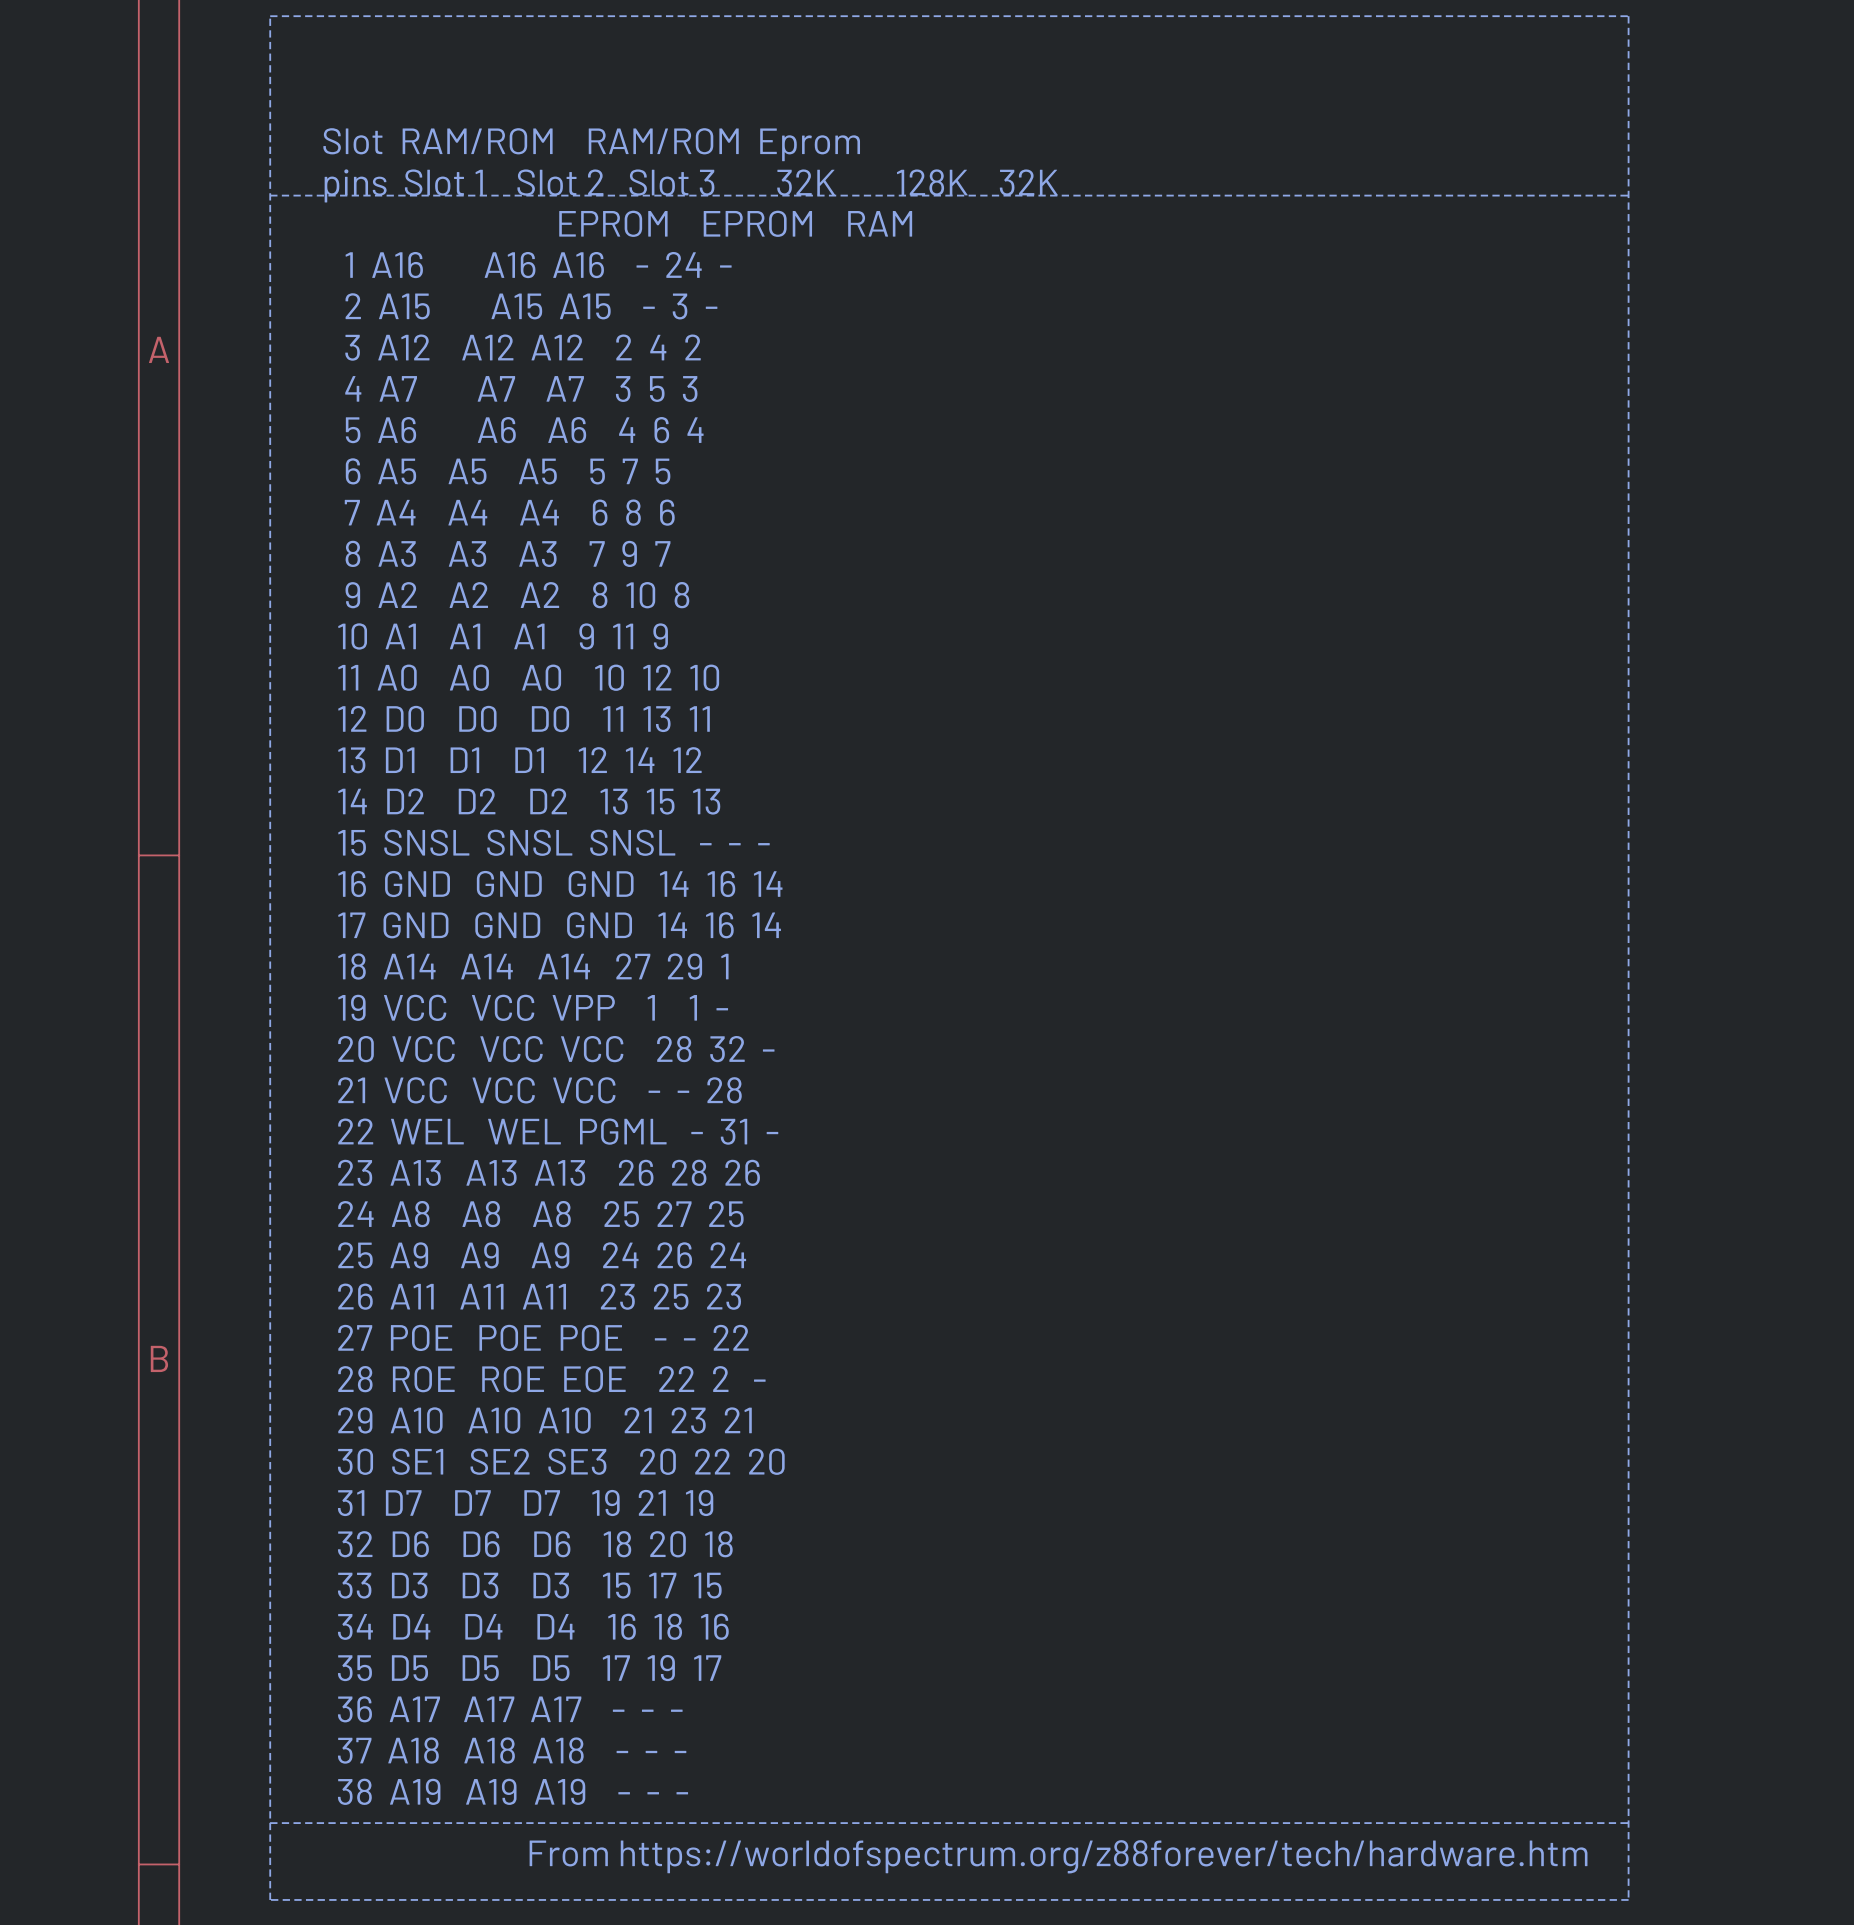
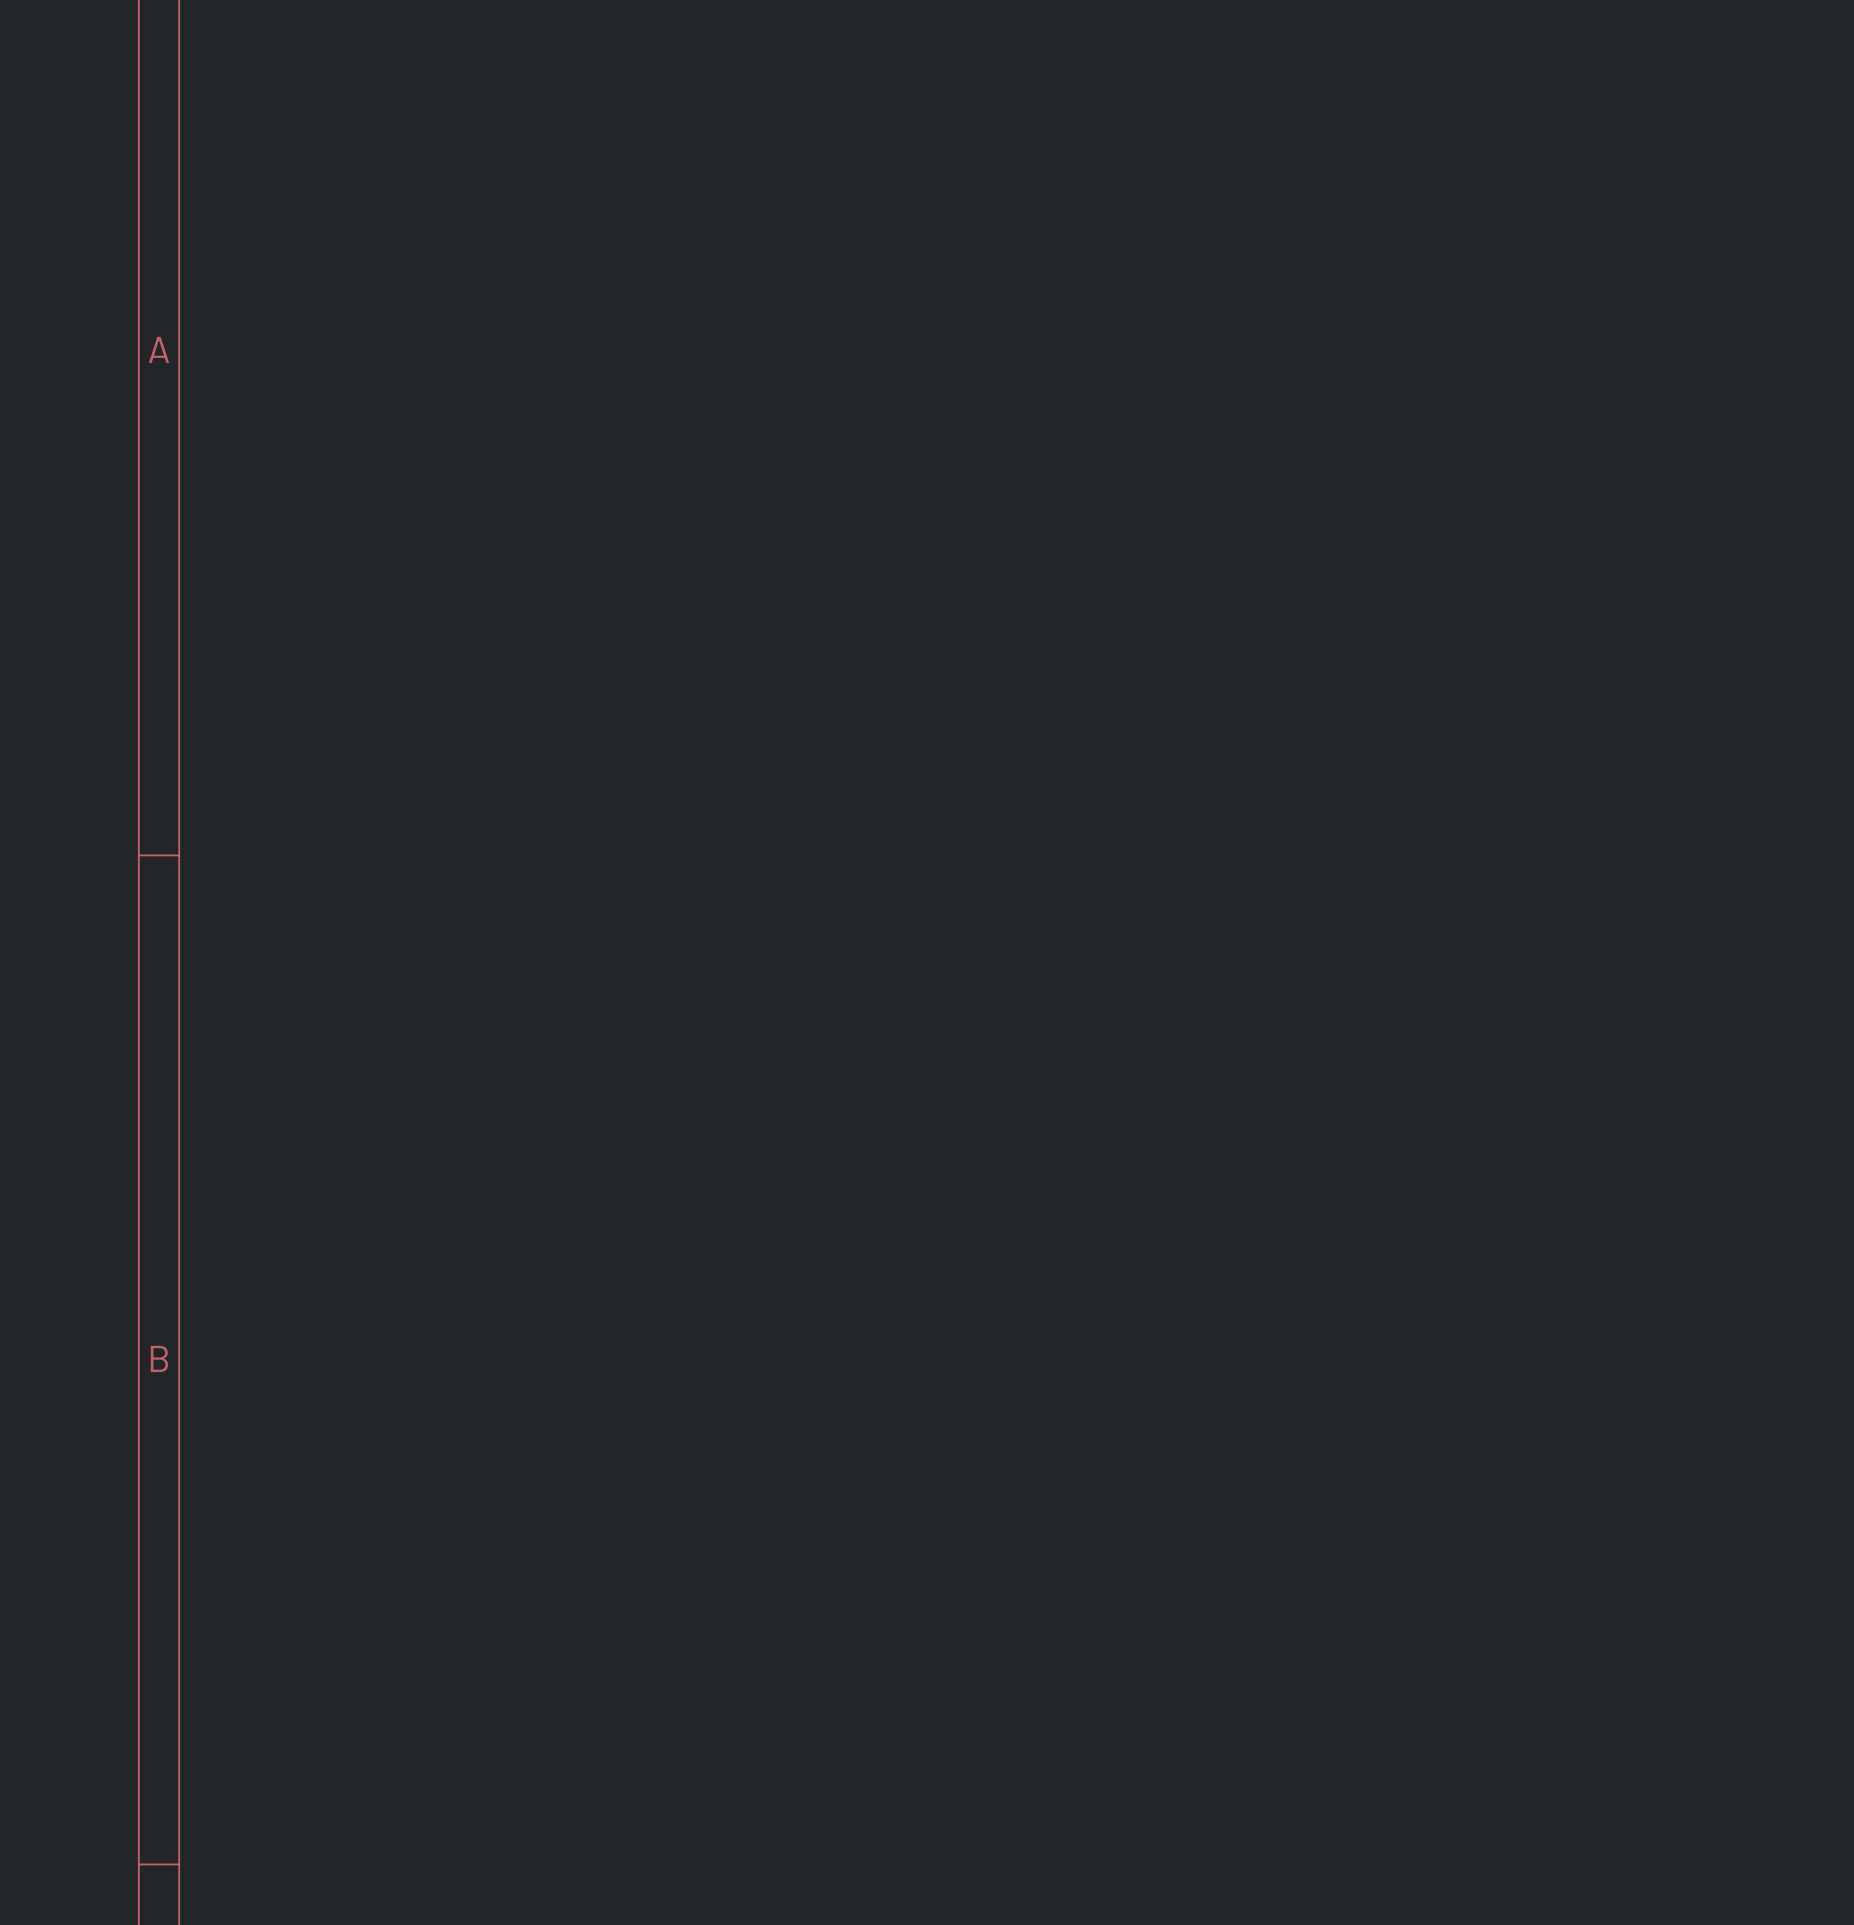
line: (270, 16) (270, 1899) (1628, 1899) (1628, 16) (270, 16) -> none
text: Slot RAM/ROM RAM/ROM Eprom (591, 144) -> none
text: pins Slot 1 Slot 2 Slot 3 32K 128K 32K (691, 185) -> none
line: (270, 195) (1628, 195) -> none
text: EPROM EPROM RAM (735, 223) -> none
text: 1 A16 A16 A16 - 24 - (538, 265) -> none
text: 2 A15 A15 A15 - 3 - (531, 306) -> none
text: 3 A12 A12 A12 2 4 2 (523, 347) -> none
text: 4 A7 A7 A7 3 5 3 (521, 389) -> none
text: 5 A6 A6 A6 4 6 4 (524, 430) -> none
text: 6 A5 A5 A5 5 7 5 (508, 471) -> none
text: 7 A4 A4 A4 6 8 6 (509, 512) -> none
text: 8 A3 A3 A3 7 9 7 (508, 553) -> none
text: 9 A2 A2 A2 8 10 8 (517, 595) -> none
text: 10 A1 A1 A1 9 11 9 (503, 636) -> none
text: 11 A0 A0 A0 10 12 10 (528, 677) -> none
text: 12 D0 D0 D0 11 13 11 (524, 718) -> none
text: 13 D1 D1 D1 12 14 12 (519, 760) -> none
text: 14 D2 D2 D2 13 15 13 (529, 801) -> none
text: 15 SNSL SNSL SNSL - - - (553, 842) -> none
text: 16 GND GND GND 14 16 14 (560, 884) -> none
text: 17 GND GND GND 14 16 14 (559, 925) -> none
text: 18 A14 A14 A14 27 29 1 (533, 966) -> none
text: 19 VCC VCC VPP 1 1 - (533, 1007) -> none
text: 20 VCC VCC VCC 28 32 - (556, 1049) -> none
text: 21 VCC VCC VCC - - 28 (539, 1090) -> none
text: 22 WEL WEL PGML - 31 - (558, 1131) -> none
text: 23 A13 A13 A13 26 28 26 (549, 1172) -> none
text: 24 A8 A8 A8 25 27 25 (540, 1214) -> none
text: 25 A9 A9 A9 24 26 24 (542, 1255) -> none
text: 26 A11 A11 A11 23 25 23 (539, 1296) -> none
text: 27 POE POE POE - - 22 (543, 1337) -> none
text: 28 ROE ROE EOE 22 2 - (551, 1379) -> none
text: 29 A10 A10 A10 21 23 21 (544, 1420) -> none
text: 30 SE1 SE2 SE3 20 22 20 (561, 1461) -> none
text: 31 D7 D7 D7 19 21 19 (525, 1502) -> none
text: 32 D6 D6 D6 18 20 18 (535, 1544) -> none
text: 33 D3 D3 D3 15 17 15 (529, 1585) -> none
text: 34 D4 D4 D4 16 18 16 (533, 1626) -> none
text: 35 D5 D5 D5 17 19 17 (529, 1668) -> none
text: 36 A17 A17 A17 - - - (510, 1709) -> none
text: 37 A18 A18 A18 - - - (512, 1750) -> none
text: 38 A19 A19 A19 - - - (513, 1791) -> none
line: (270, 1823) (1628, 1823) -> none
text: From https://worldofspectrum.org/z88forever/tech/hardware.htm (1058, 1856) -> none

